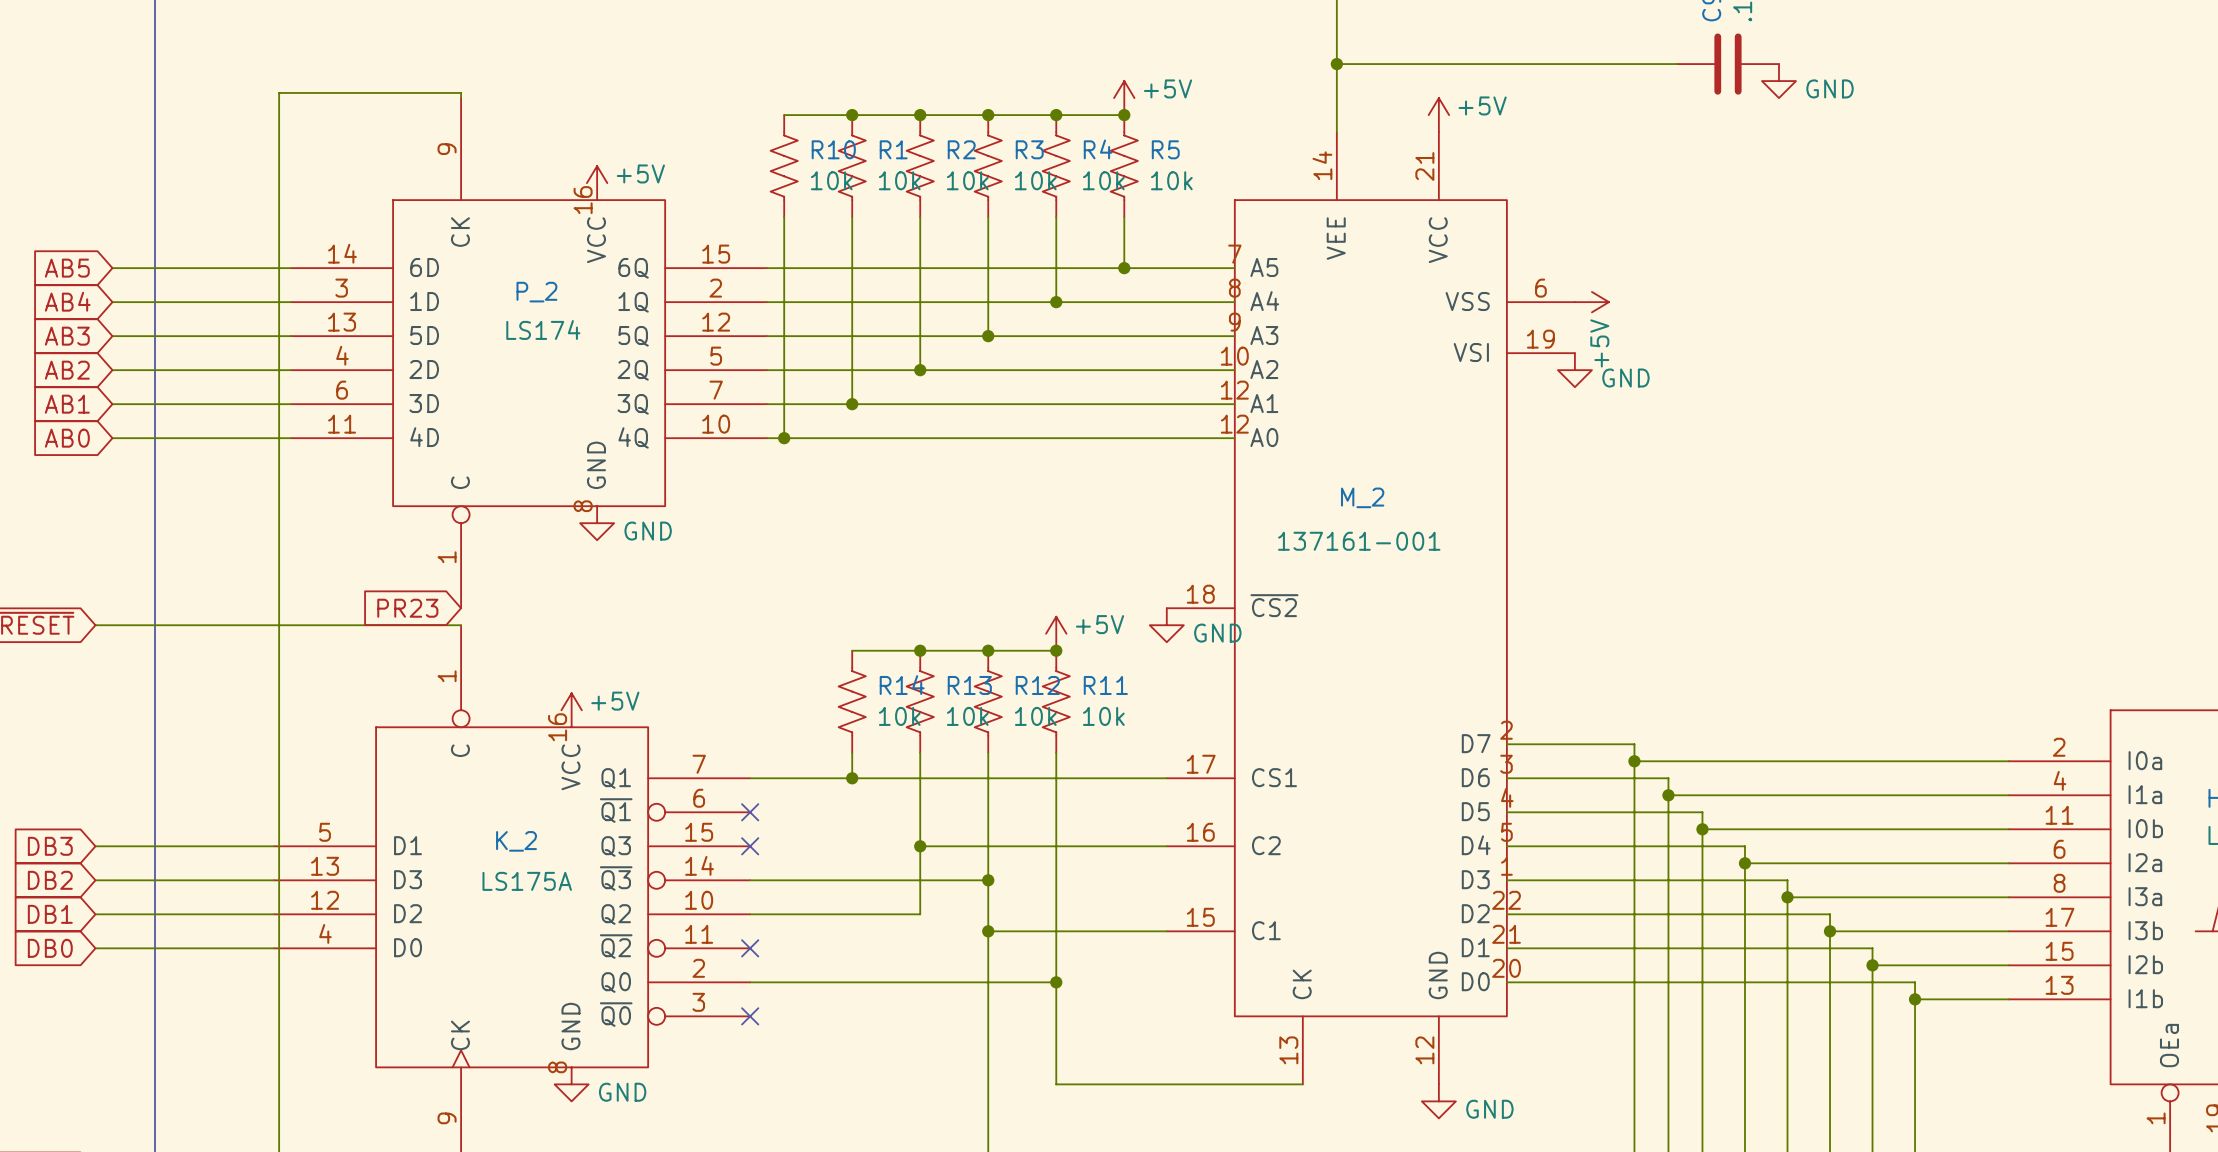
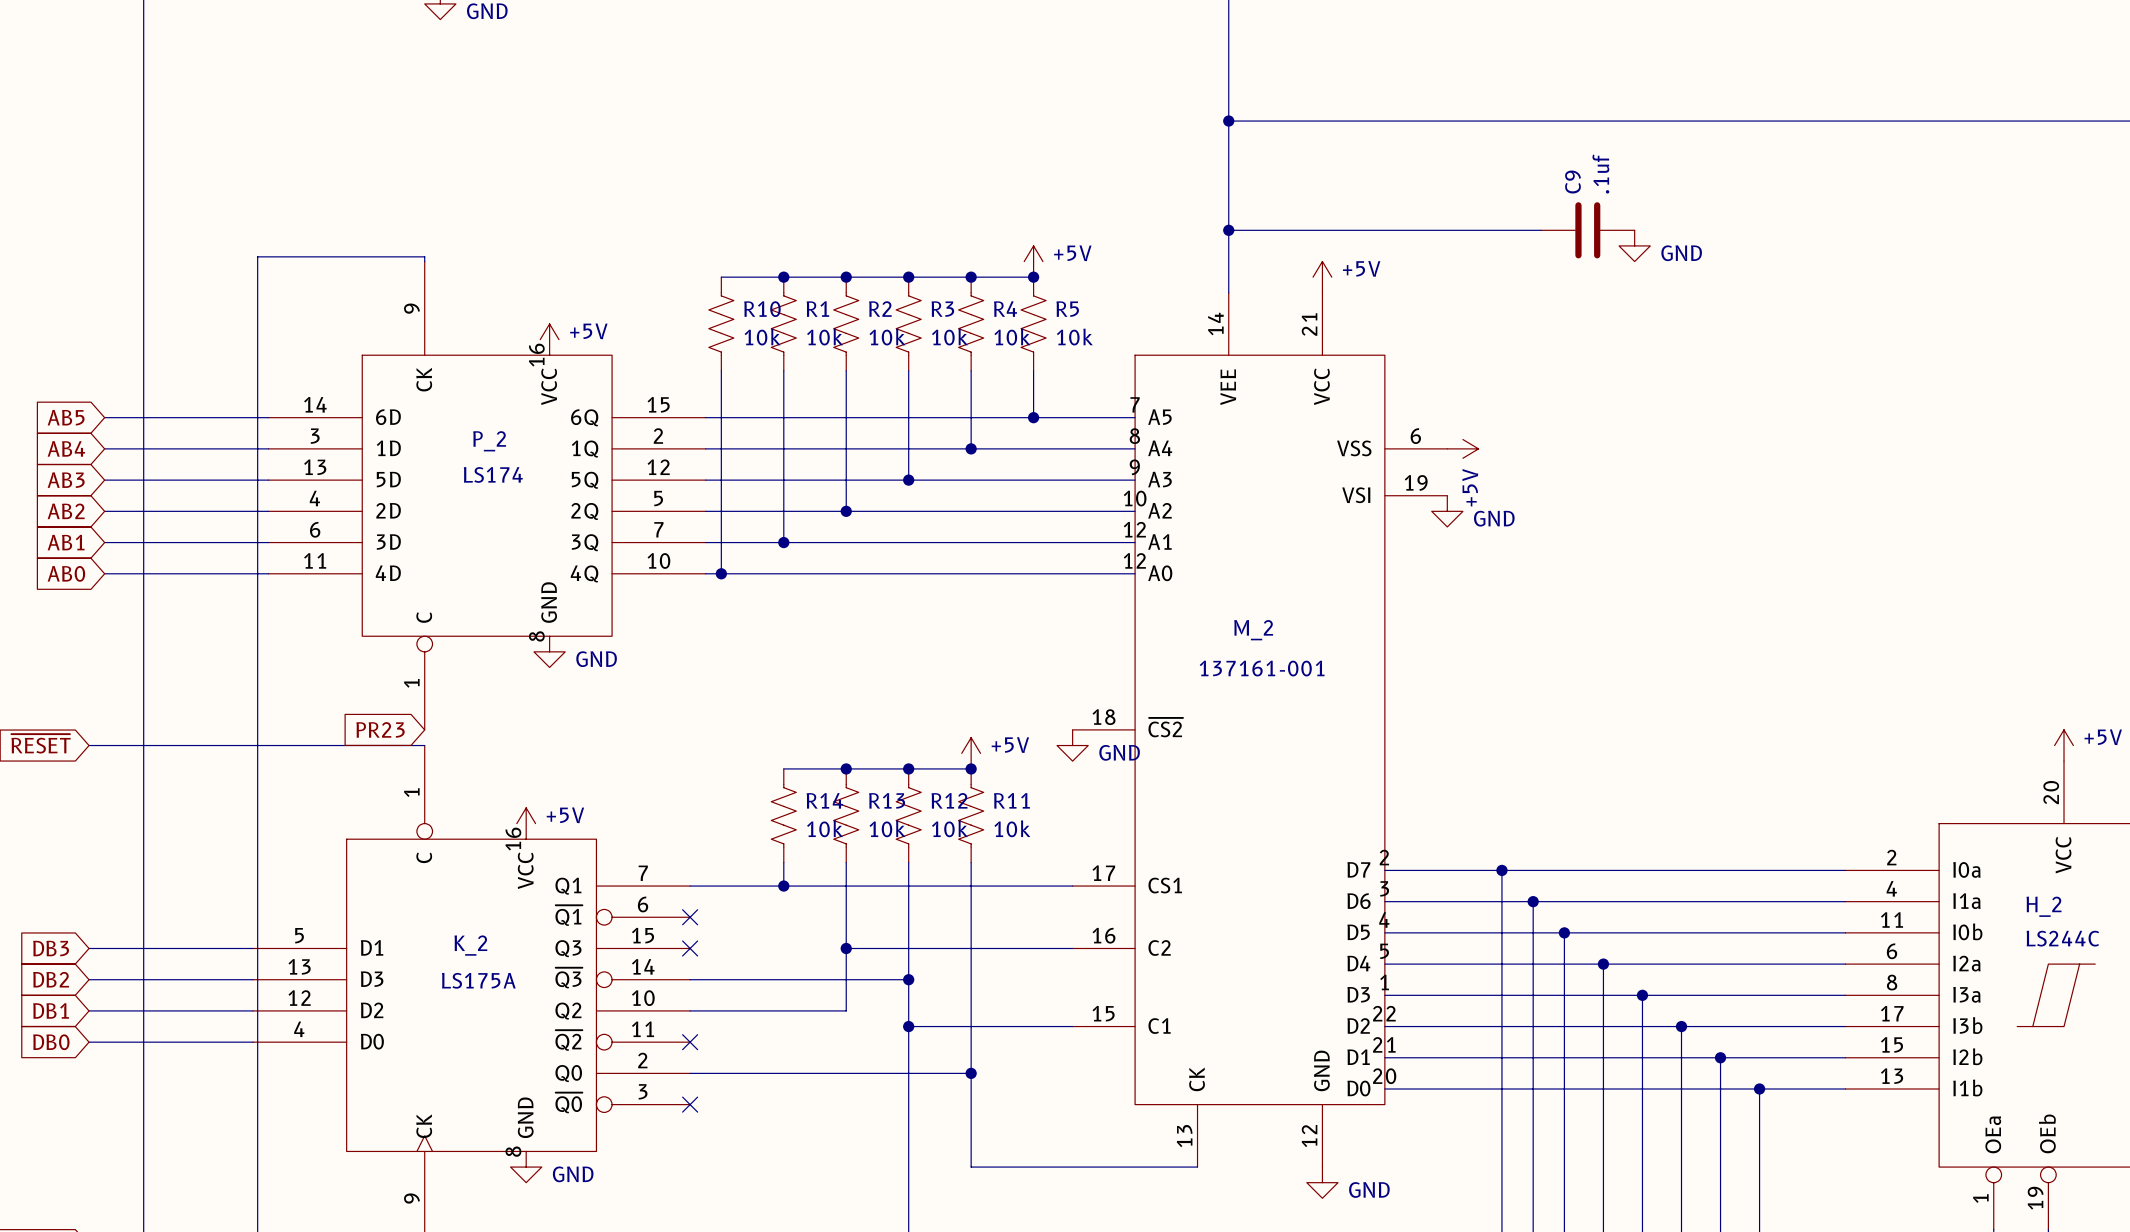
M_2 symbol: [1166, 132, 1575, 1085] -> [1072, 292, 1448, 1168]
wire: (1506, 744) (1634, 744) (1634, 761) -> (1384, 870) (1501, 870)
wire: (1506, 778) (1668, 778) (1668, 795) -> (1384, 901) (1533, 901)
wire: (1506, 812) (1702, 812) (1702, 829) -> (1384, 932) (1564, 932)
wire: (1506, 846) (1744, 846) (1744, 863) -> (1384, 964) (1603, 964)
wire: (1506, 880) (1787, 880) (1787, 897) -> (1384, 995) (1642, 995)
wire: (1506, 914) (1830, 914) (1830, 931) -> (1384, 1026) (1681, 1026)
wire: (1506, 948) (1872, 948) (1872, 965) -> (1384, 1057) (1720, 1057)
wire: (1506, 982) (1915, 982) (1915, 999) -> (1384, 1089) (1759, 1089)

